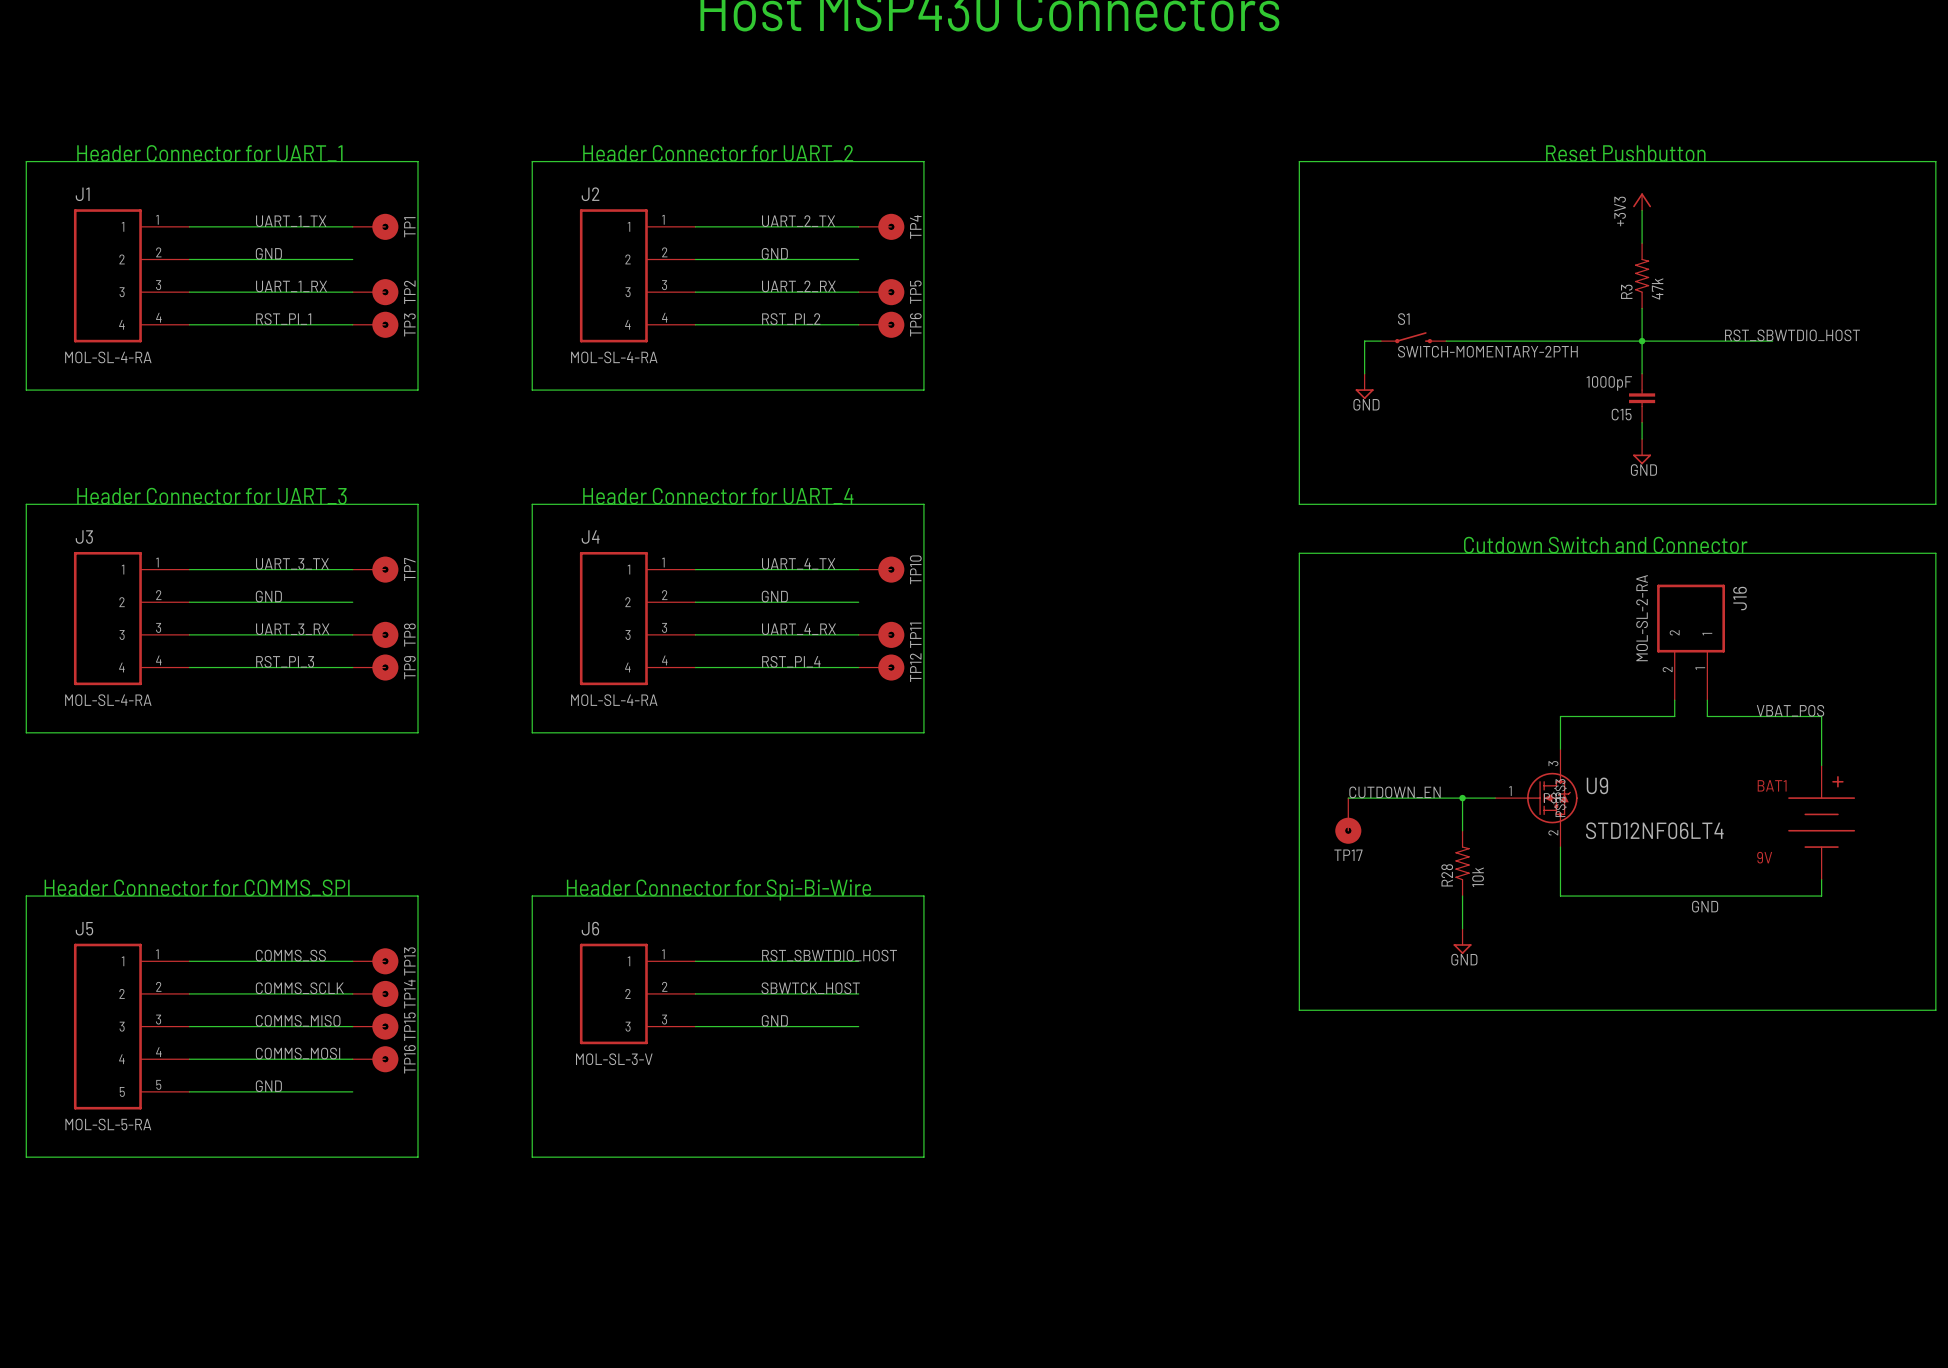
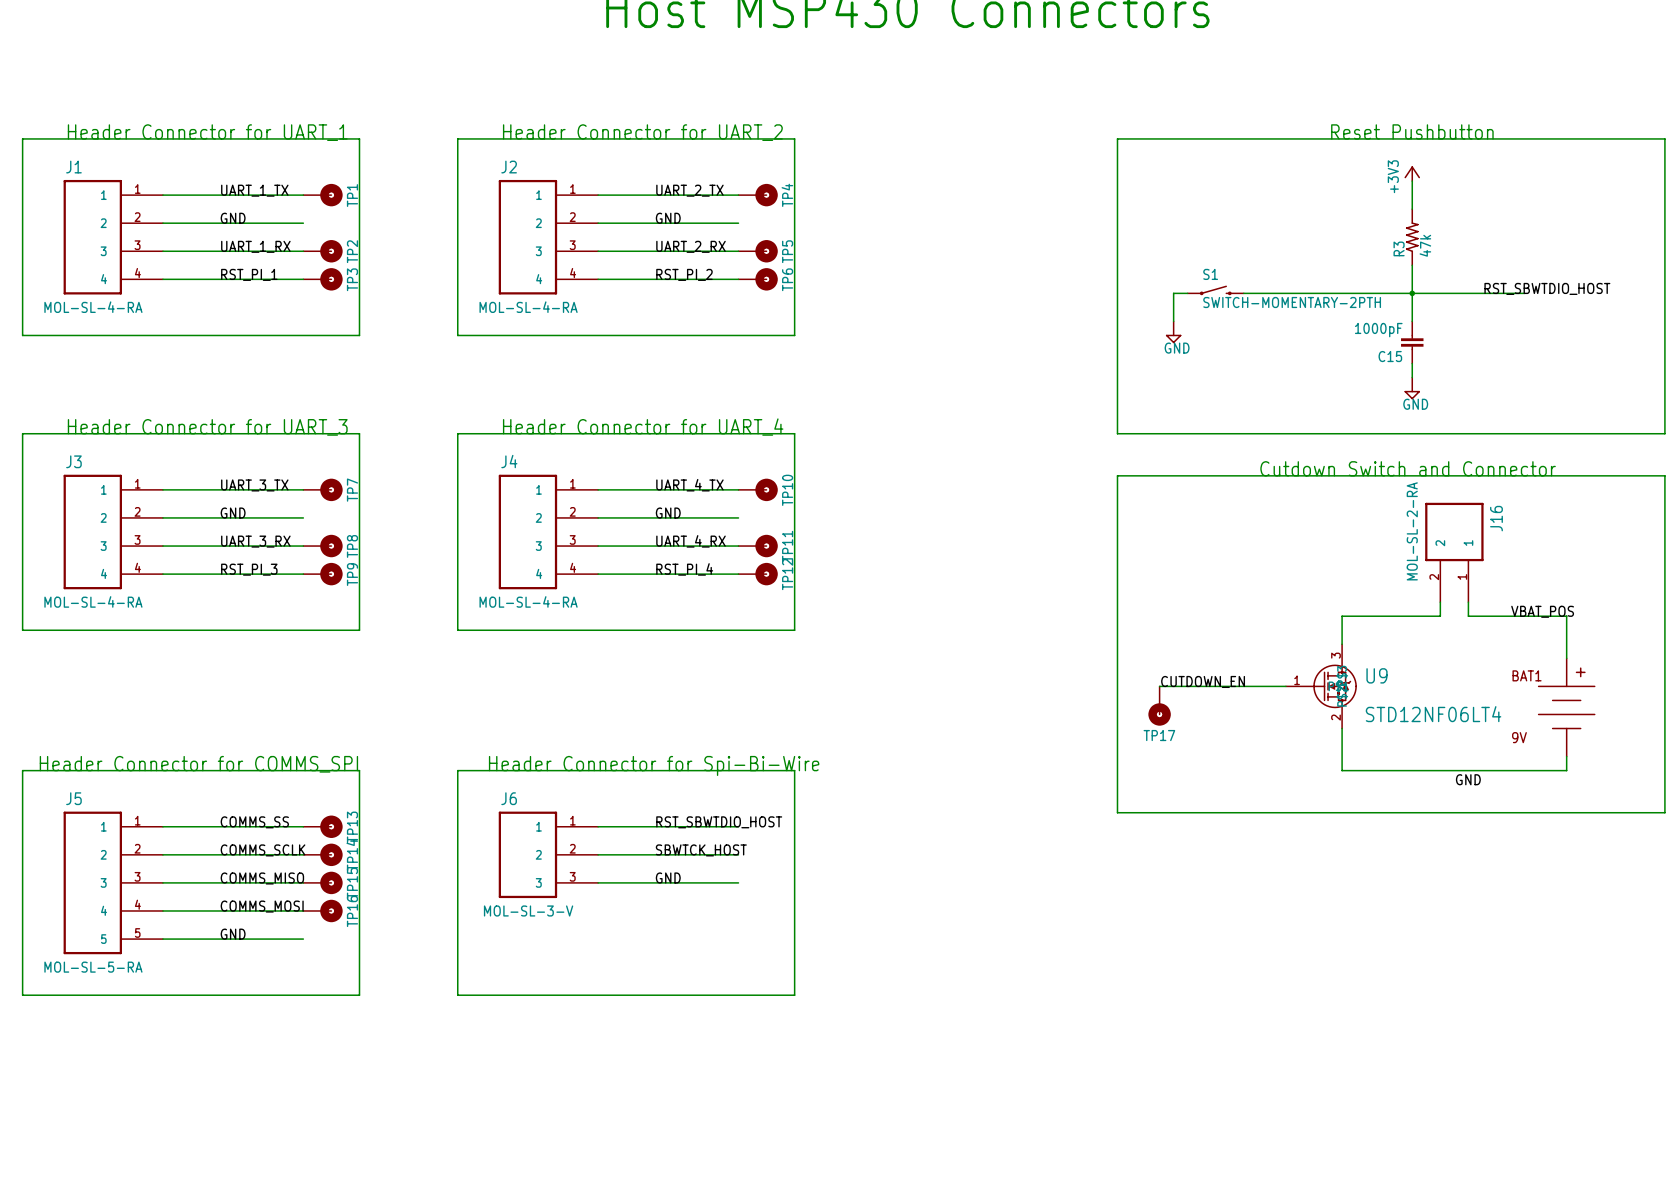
wire: (1462, 798) (1462, 830) -> none
junction: (1462, 798) -> none
R28: 10k (1462, 863) -> none
wire: (1462, 896) (1462, 928) -> none
power symbol: GND (1462, 941) -> none
wire: (1299, 944) (1299, 1010) (1935, 1010) (1935, 944) -> (1117, 812) (1664, 812)

